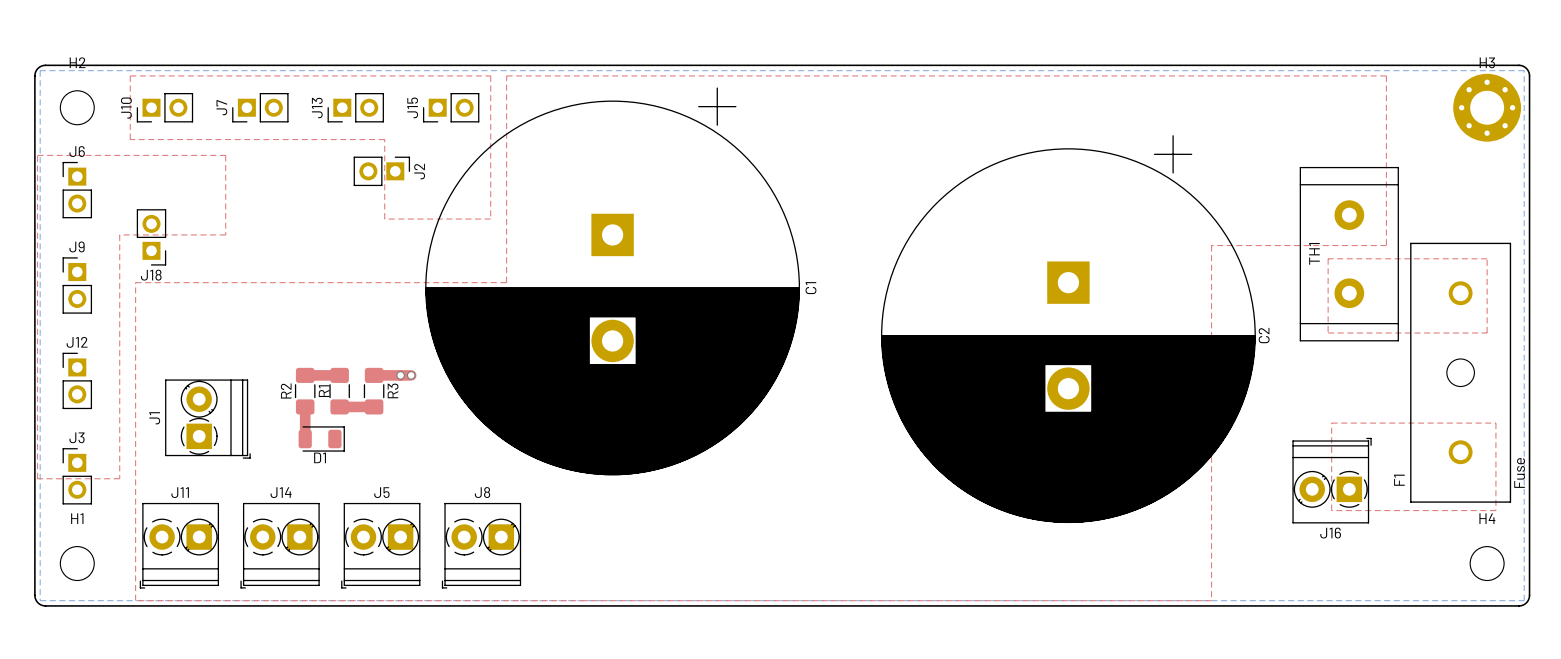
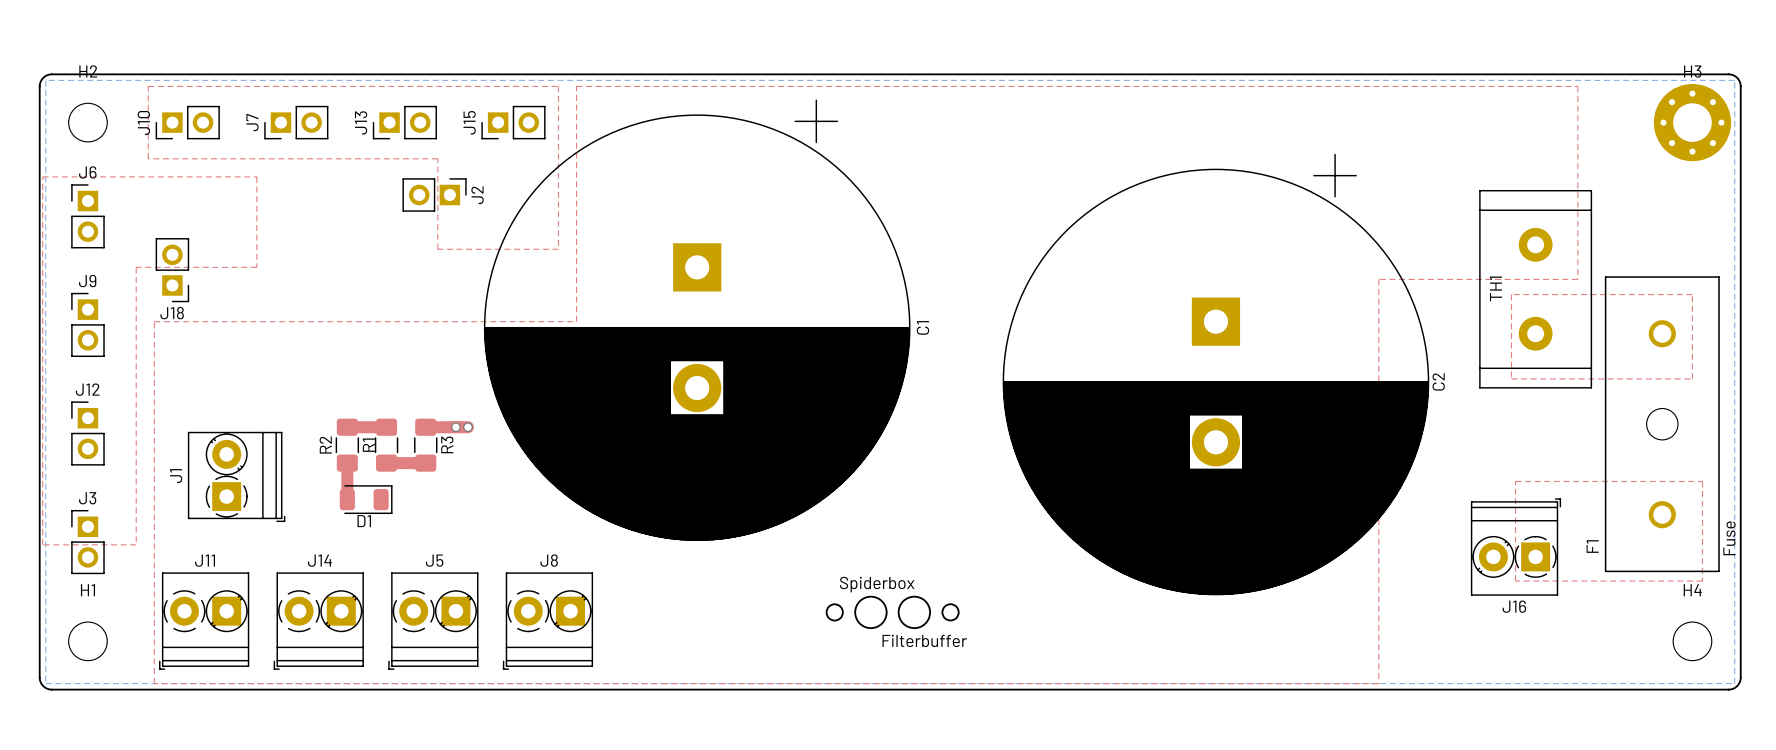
text: none -> Spiderbox (877, 584)
drawing: none -> [825, 595, 960, 630]
text: none -> Filterbuffer (924, 640)

